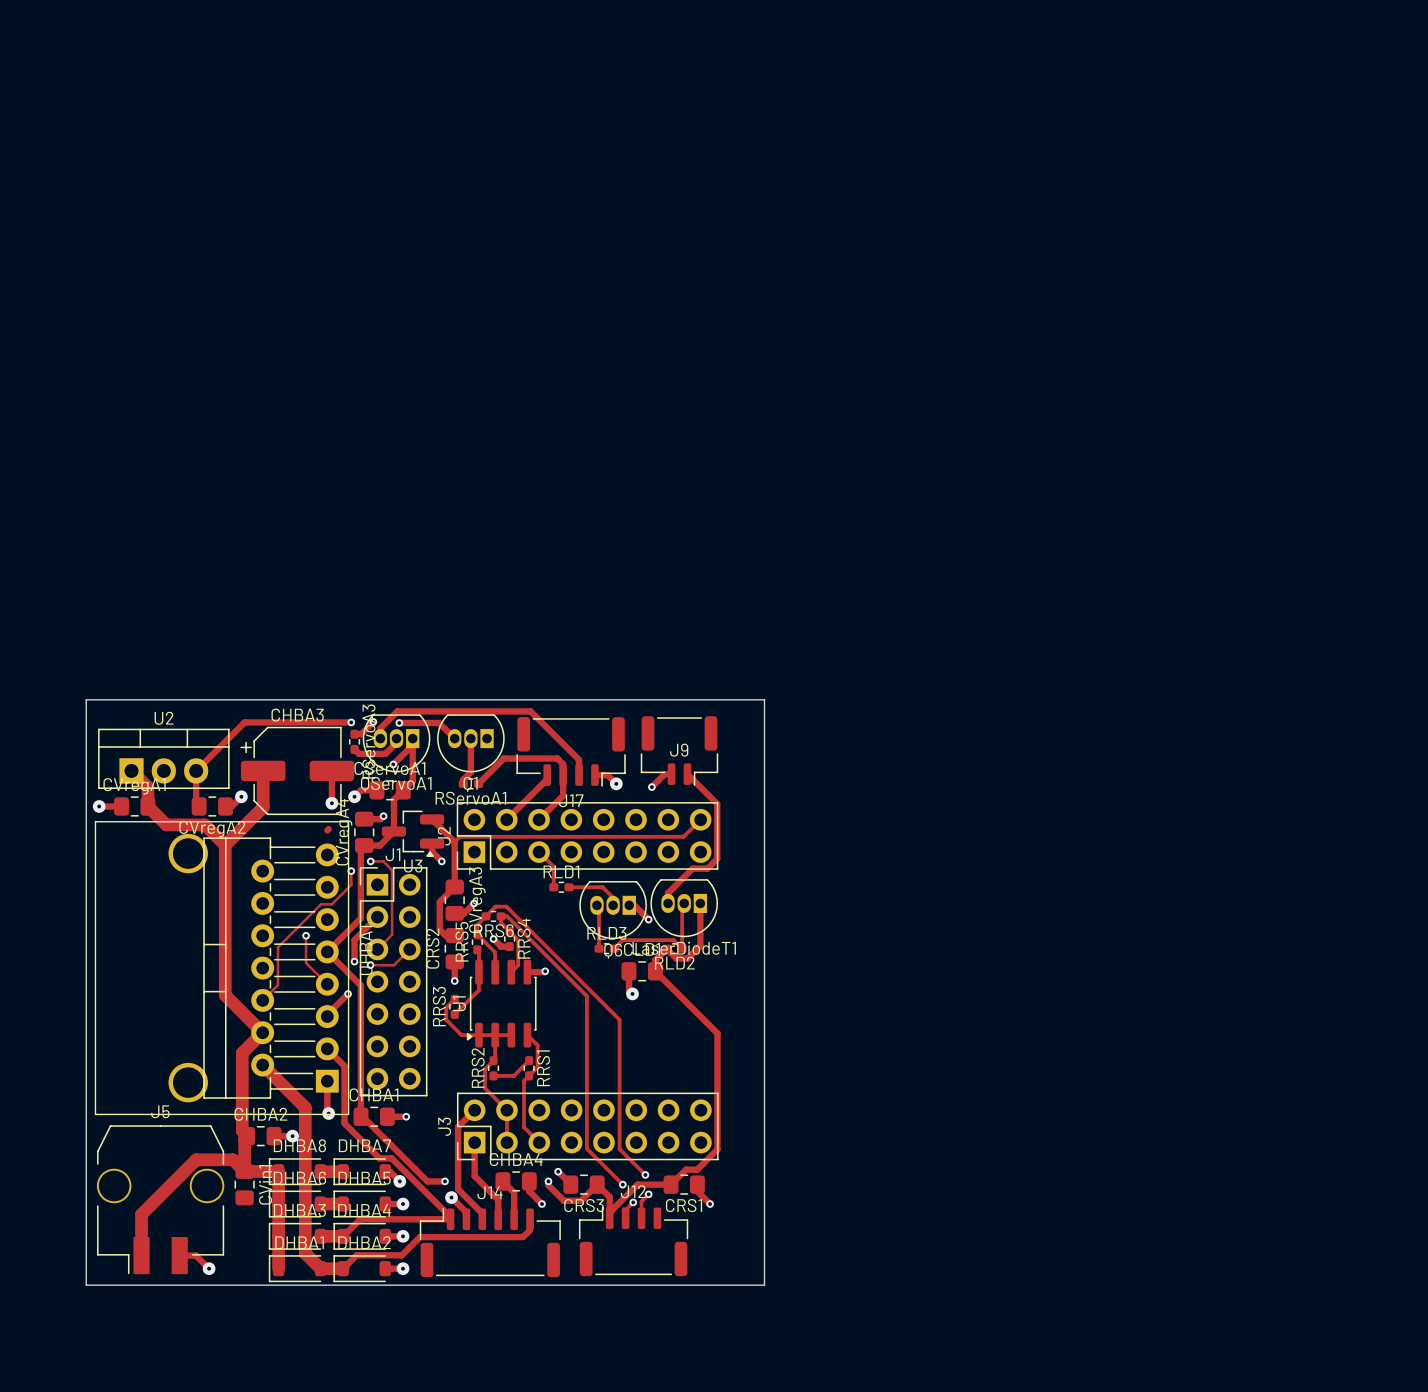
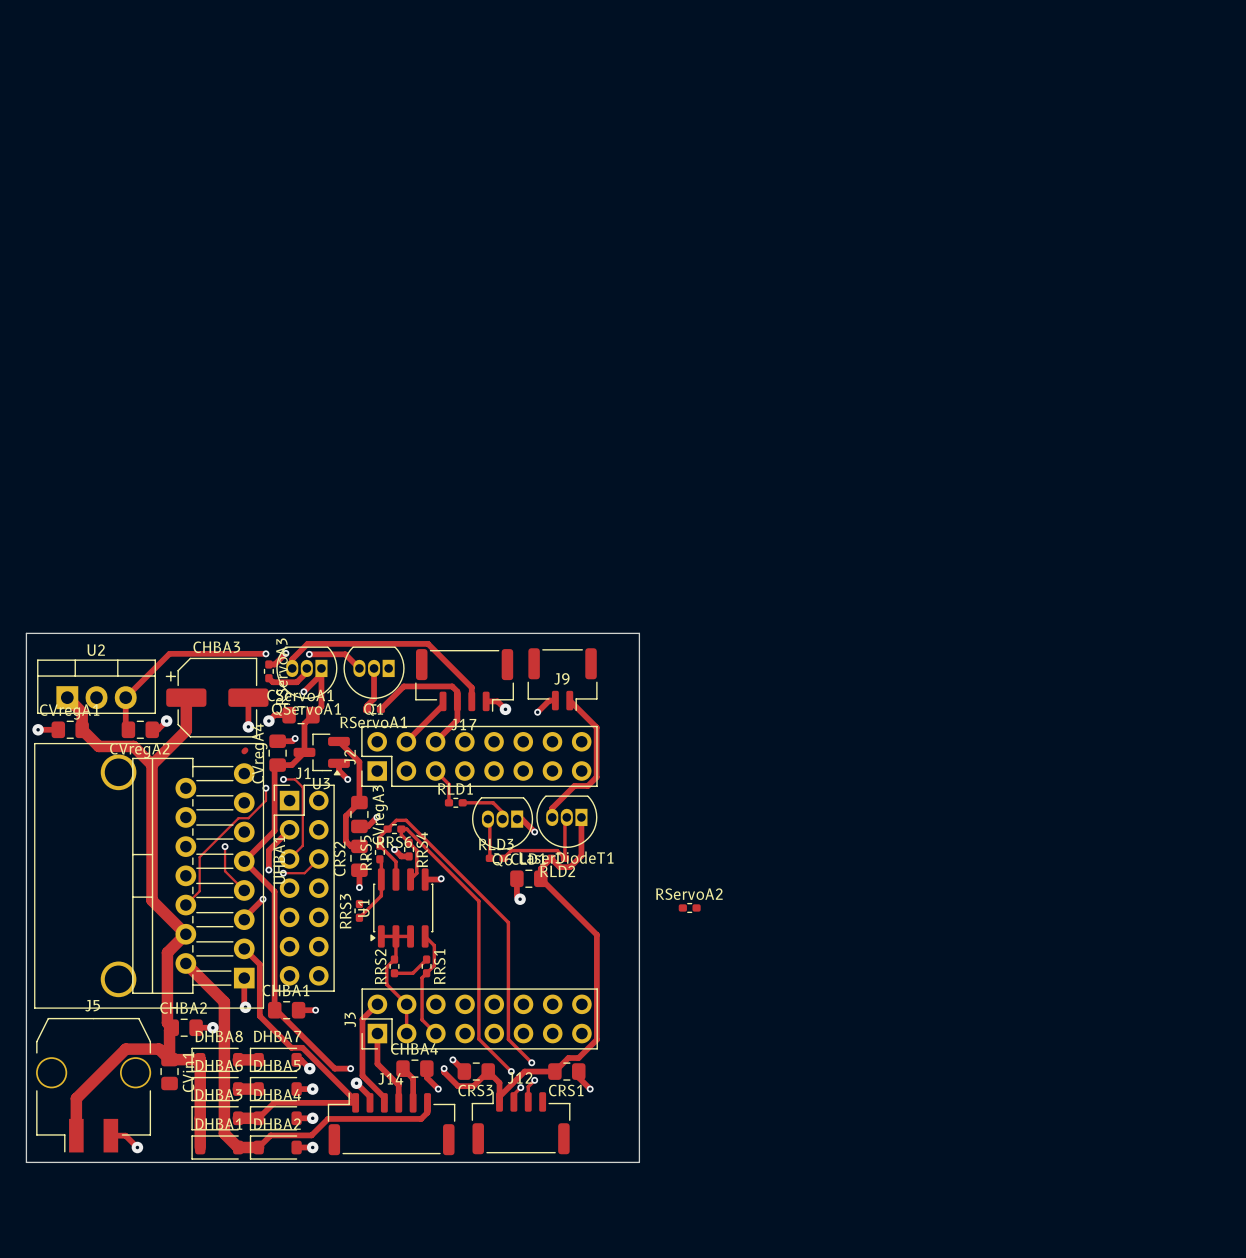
track: (700, 819) (683, 836) (459, 836) (454, 842) -> none
track: (454, 999) (446, 1007) (446, 1019) (461, 1035) (478, 1035) -> none
RServoA2: none -> (689, 907)

